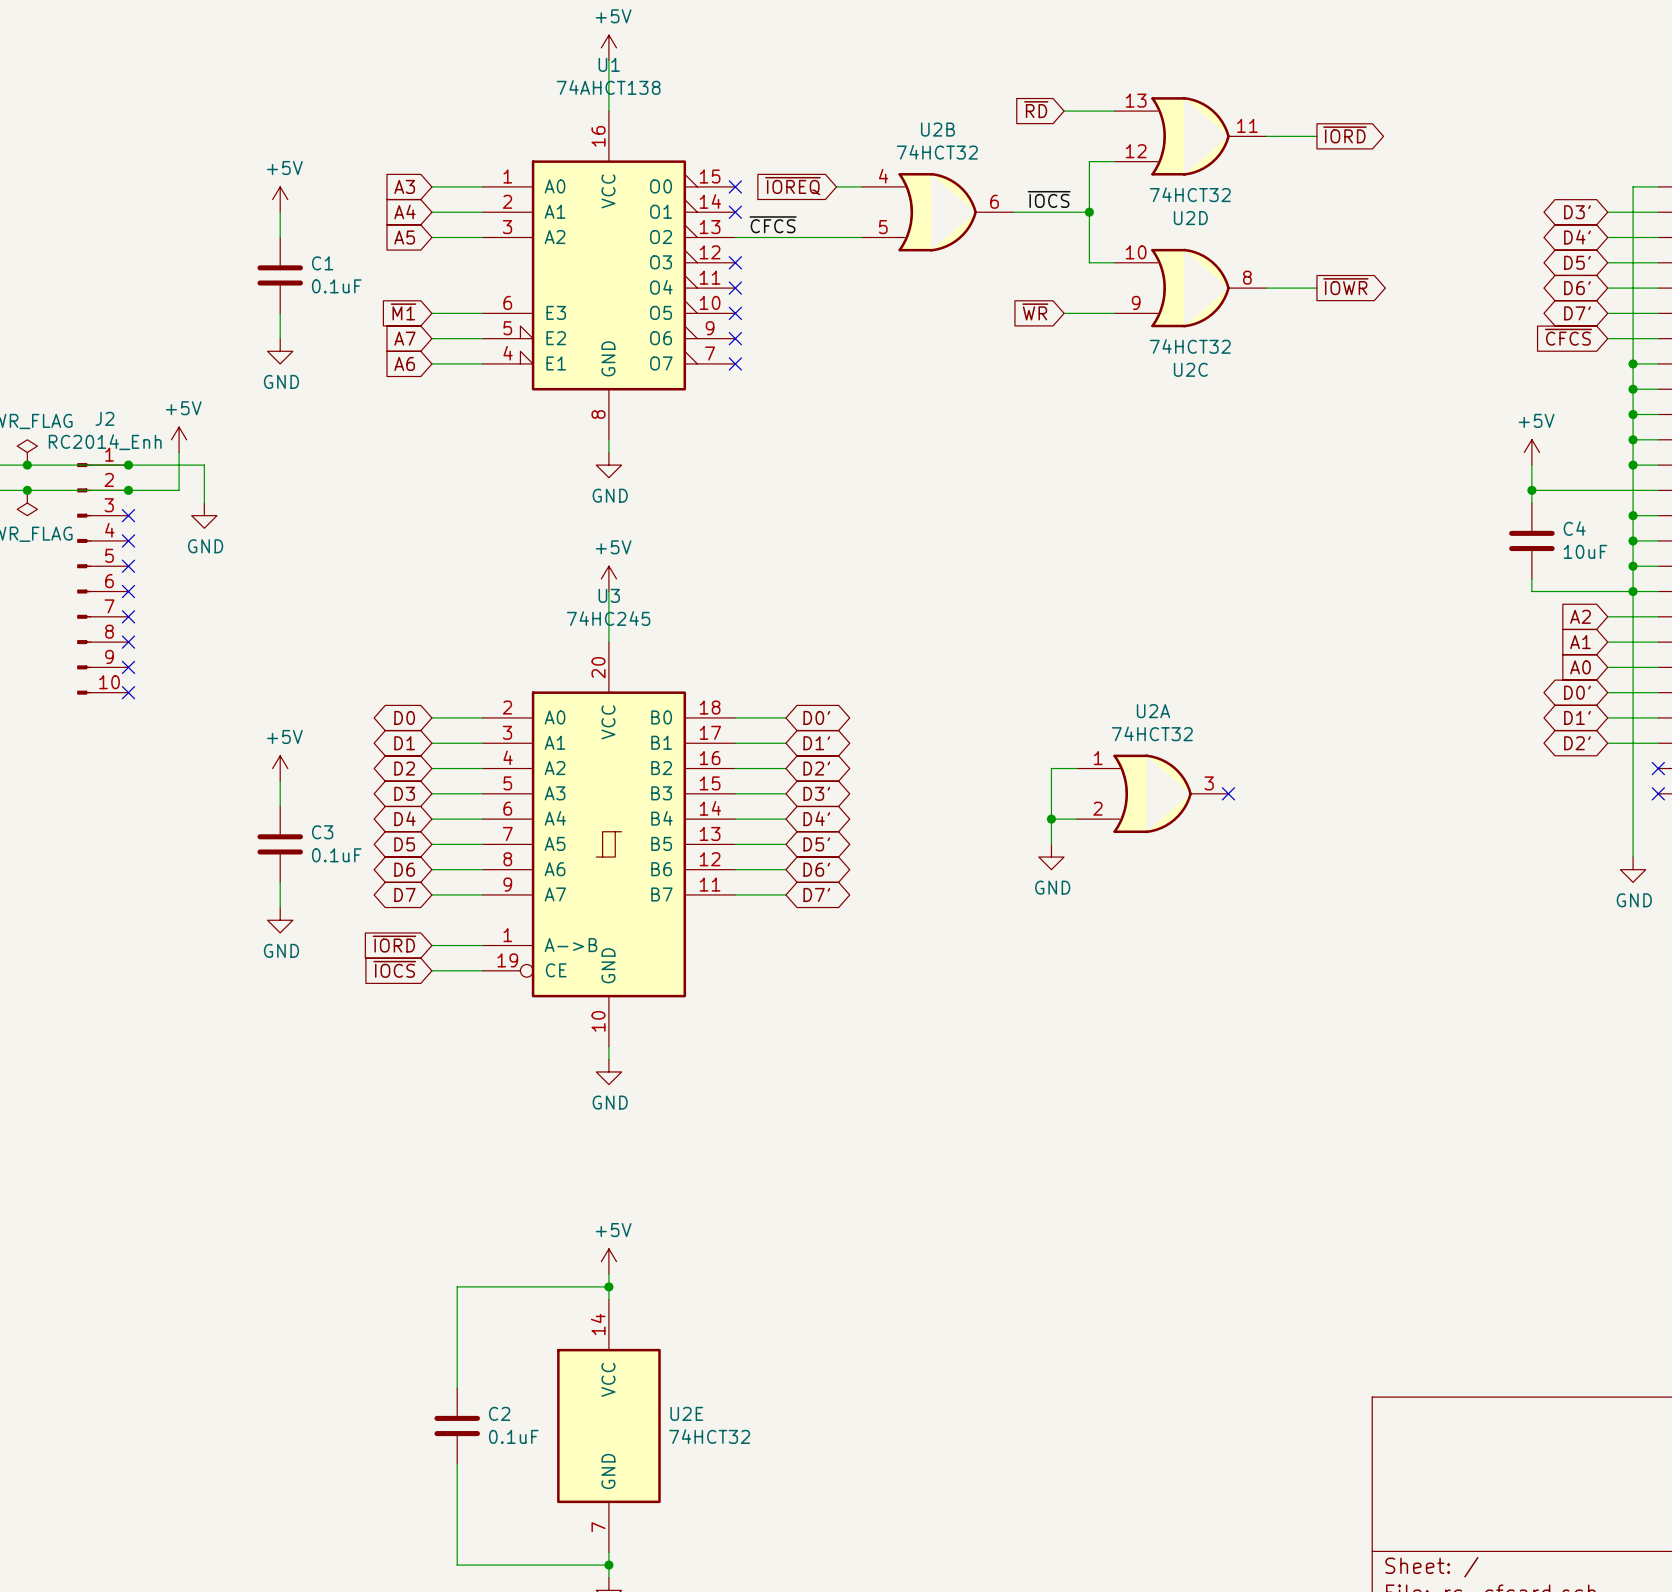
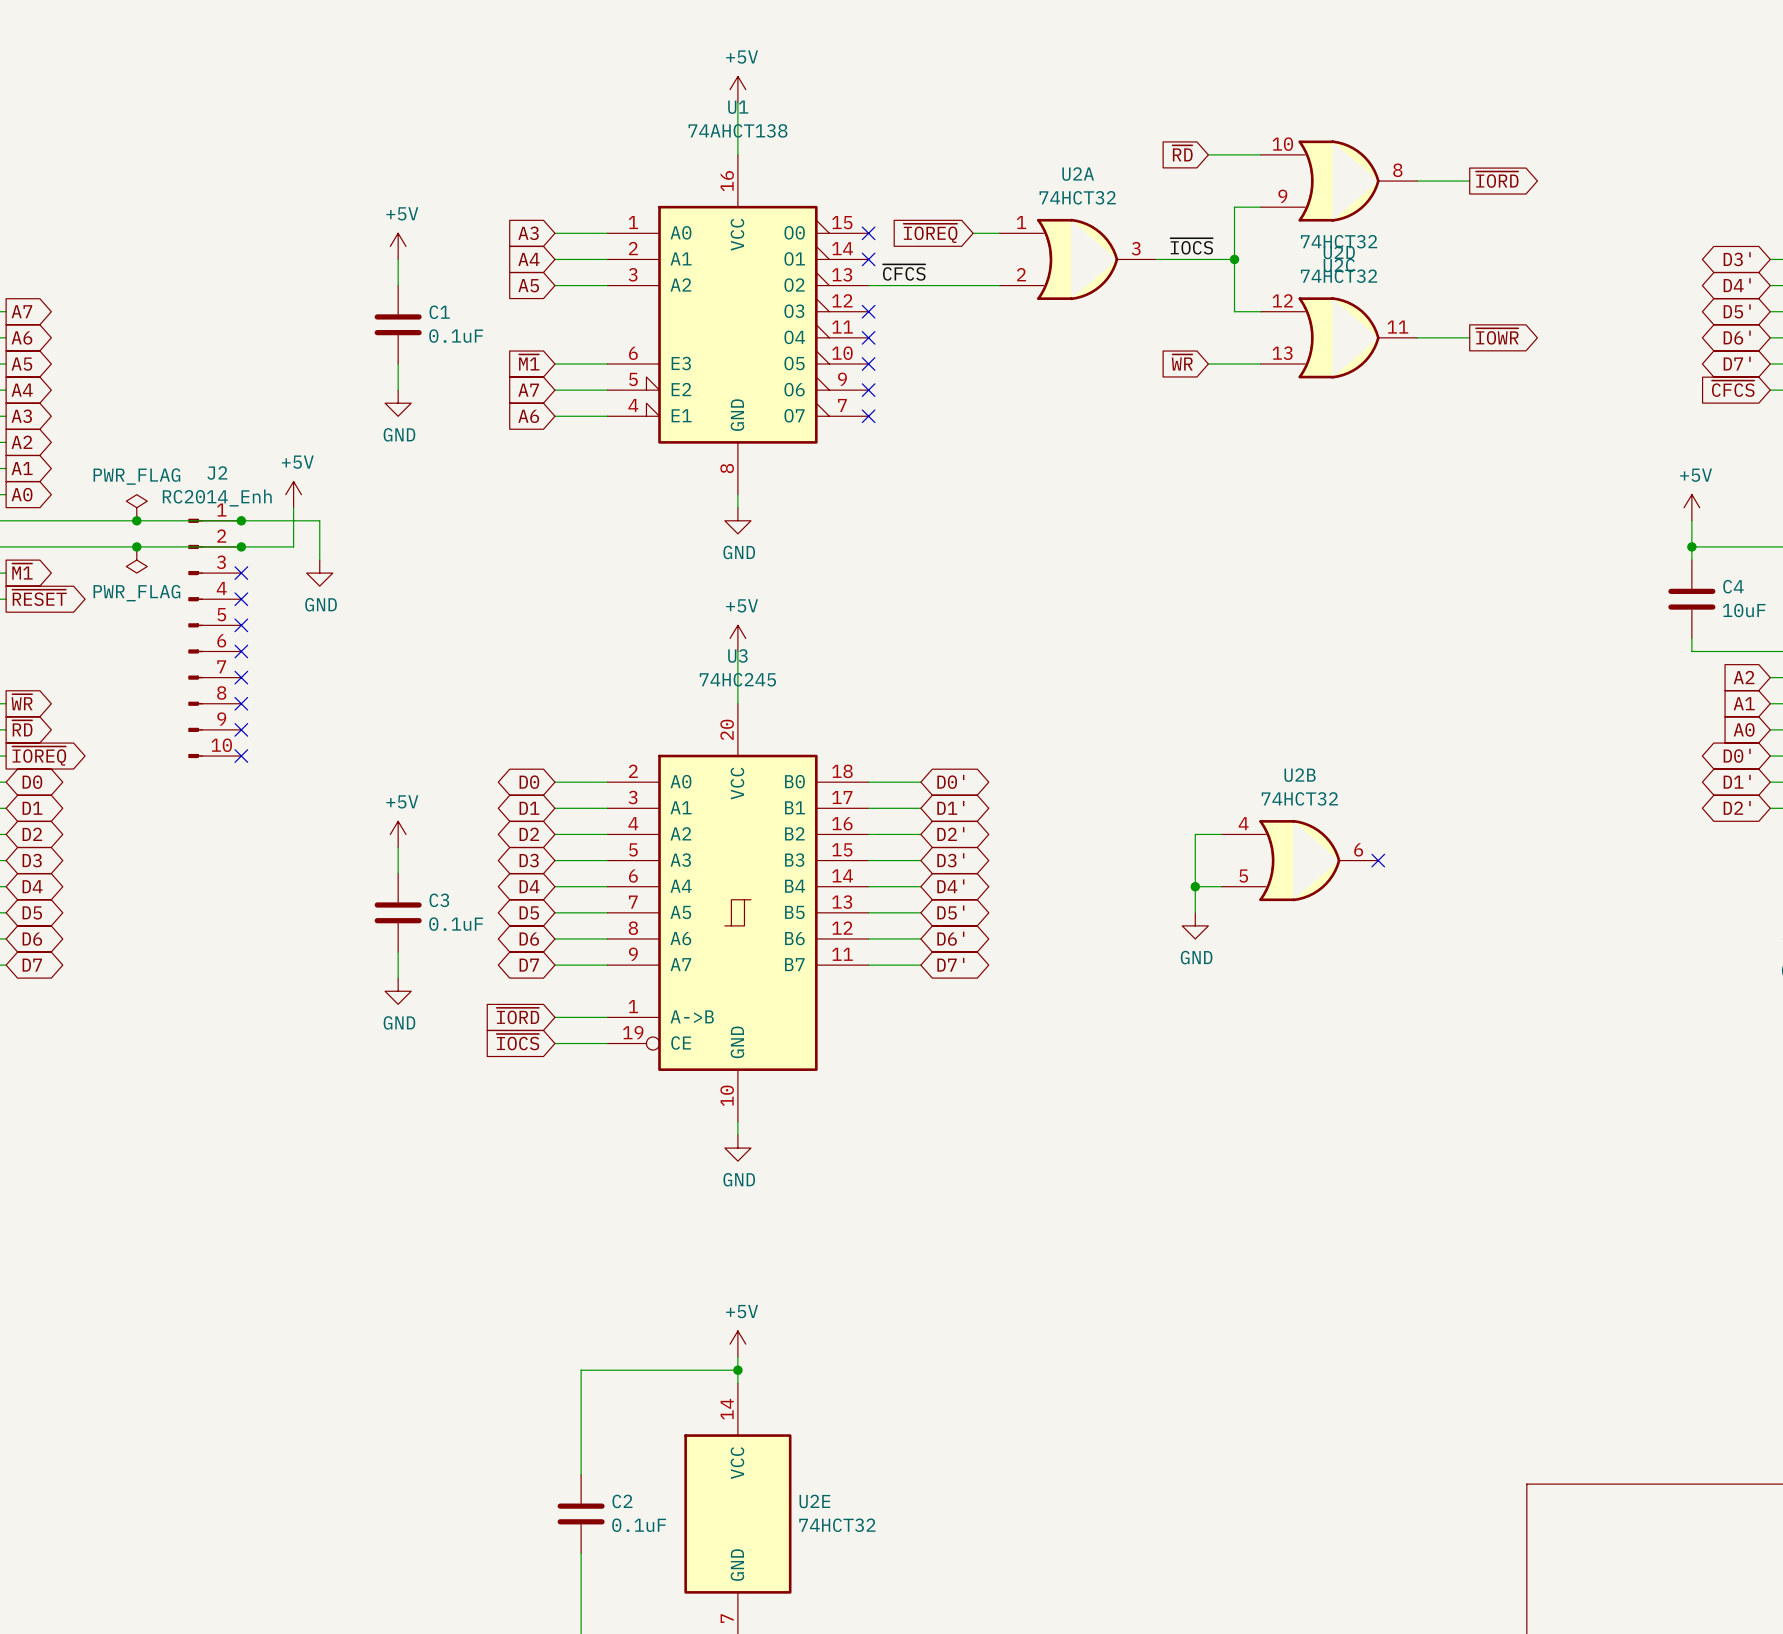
U2D flip: as is (1190, 136) -> up-down (1339, 337)
U2D position: (1190, 136) -> (1339, 337)
U2B position: (937, 212) -> (1299, 860)
U2C position: (1190, 288) -> (1339, 181)
U2A position: (1152, 793) -> (1077, 259)

